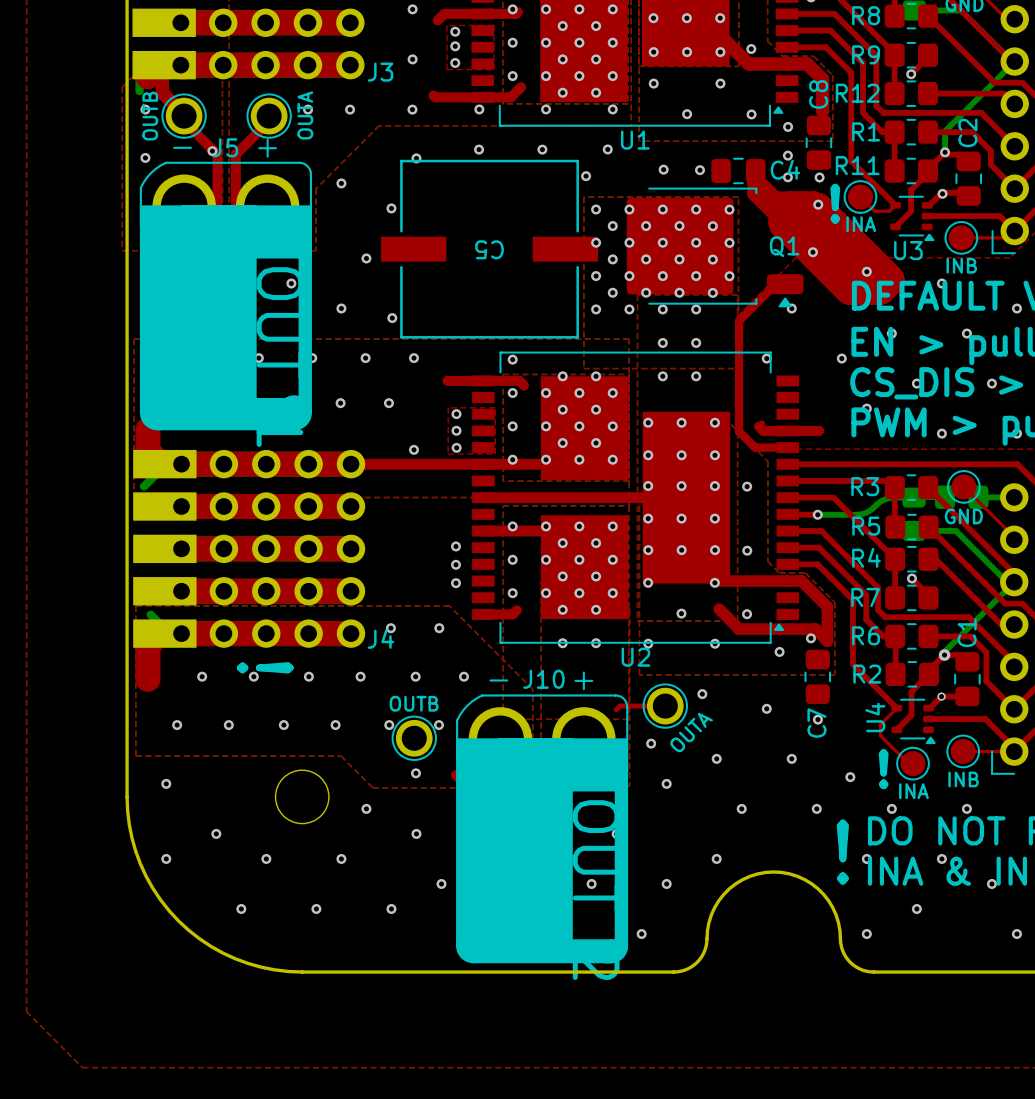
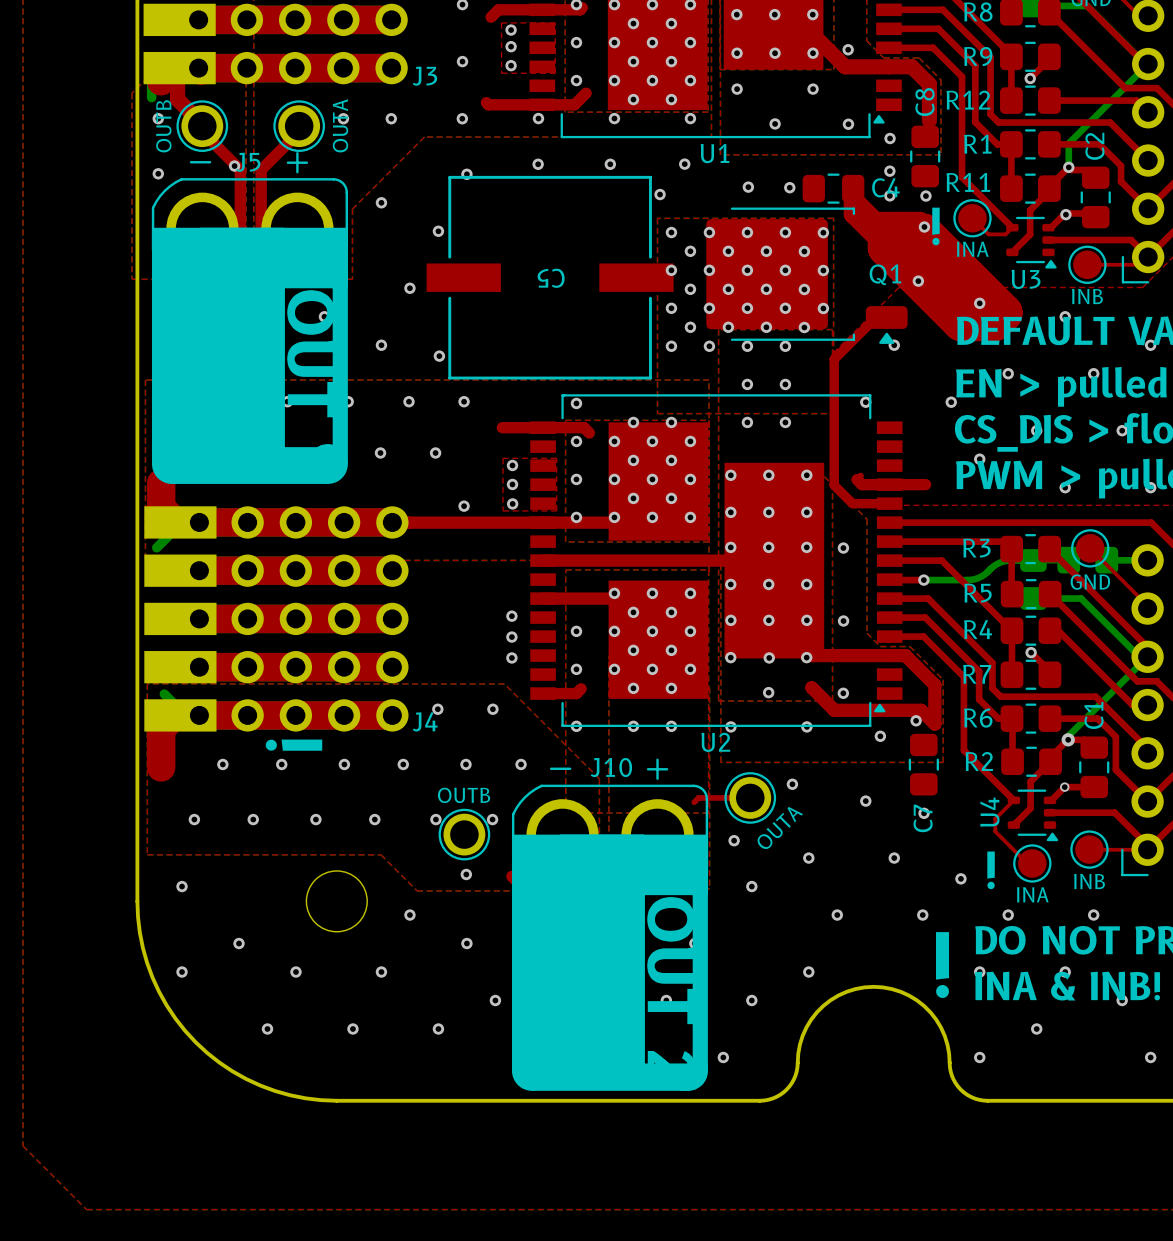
via: (512, 526) -> none
via: none -> (769, 657)
via: none -> (576, 726)

